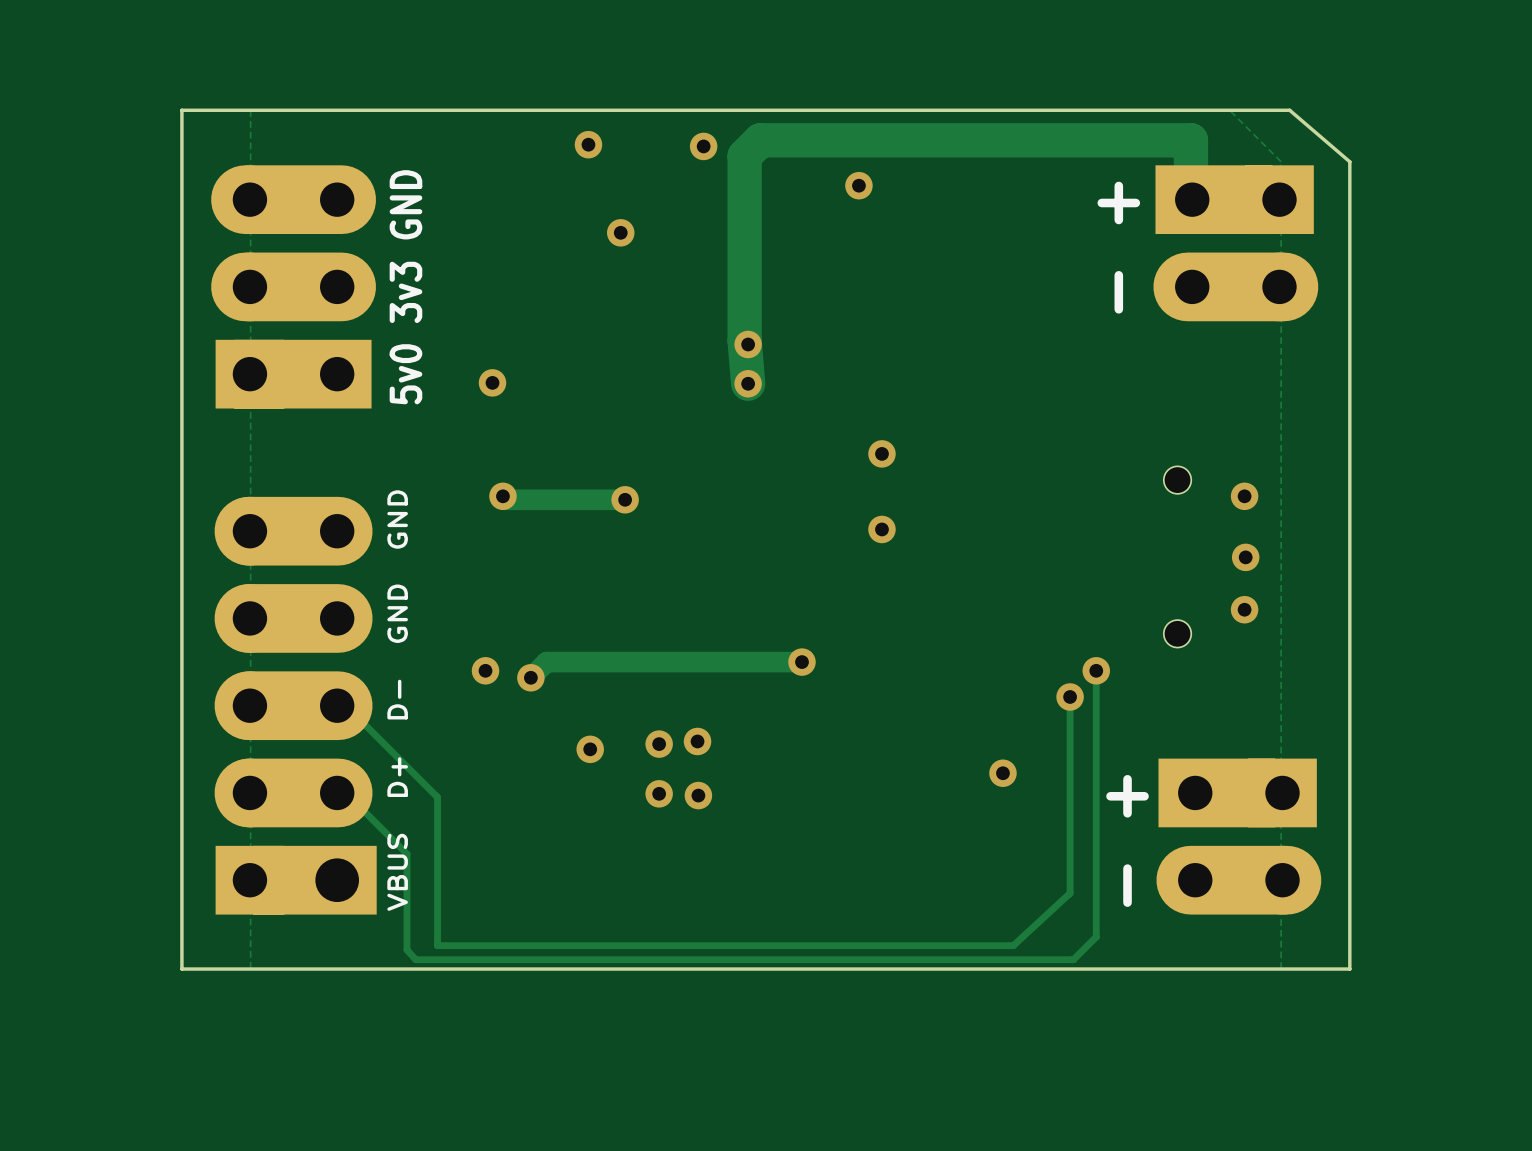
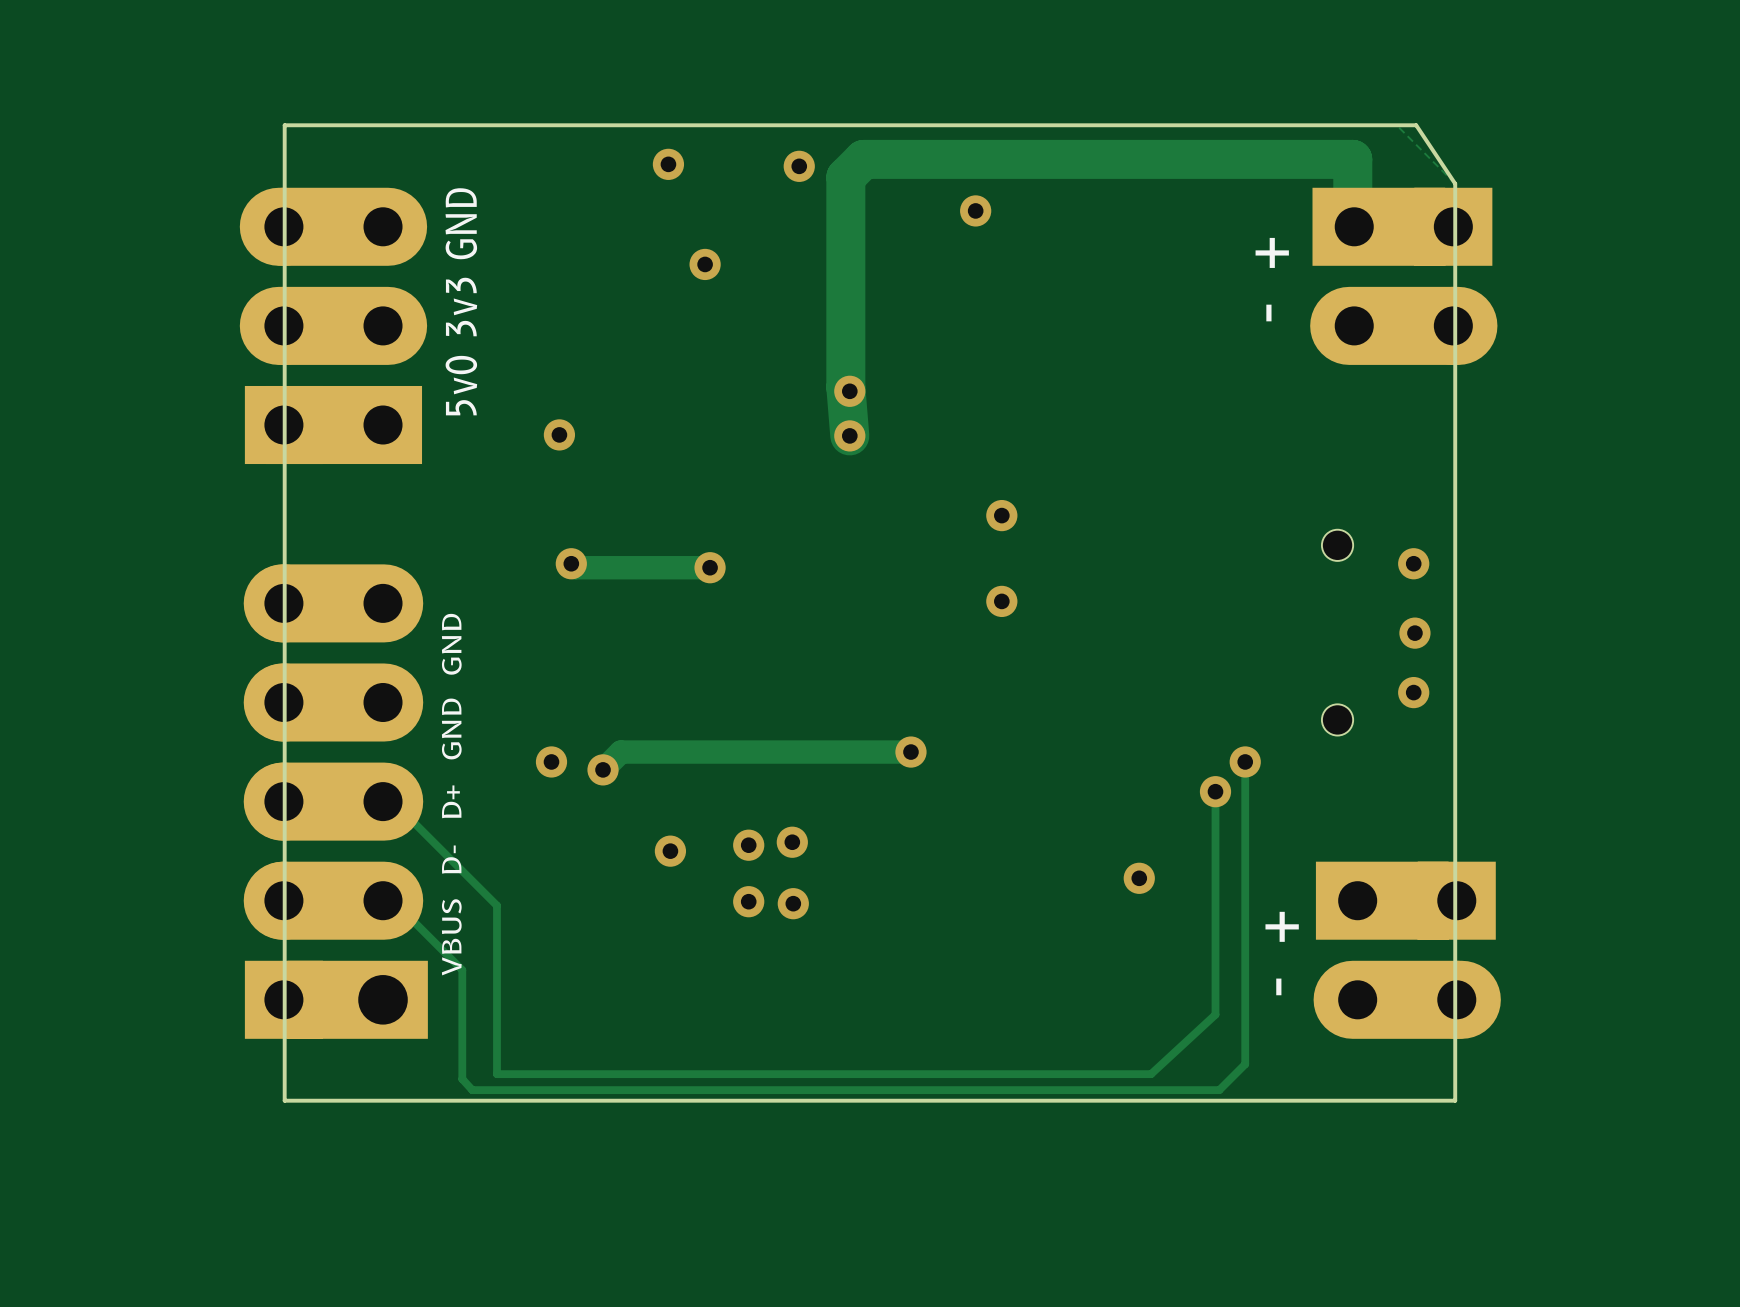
board edge: (250, 110) (181, 110) (181, 969) (250, 969) -> (284, 125) (284, 1100)
board edge: (1246, 110) (1289, 110) (1349, 161) (1349, 969) (1281, 969) -> (1416, 125) (1455, 183) (1455, 1100)
text: VBUS D+ D- GND GND (397, 700) -> VBUS D- D+ GND GND (451, 794)

